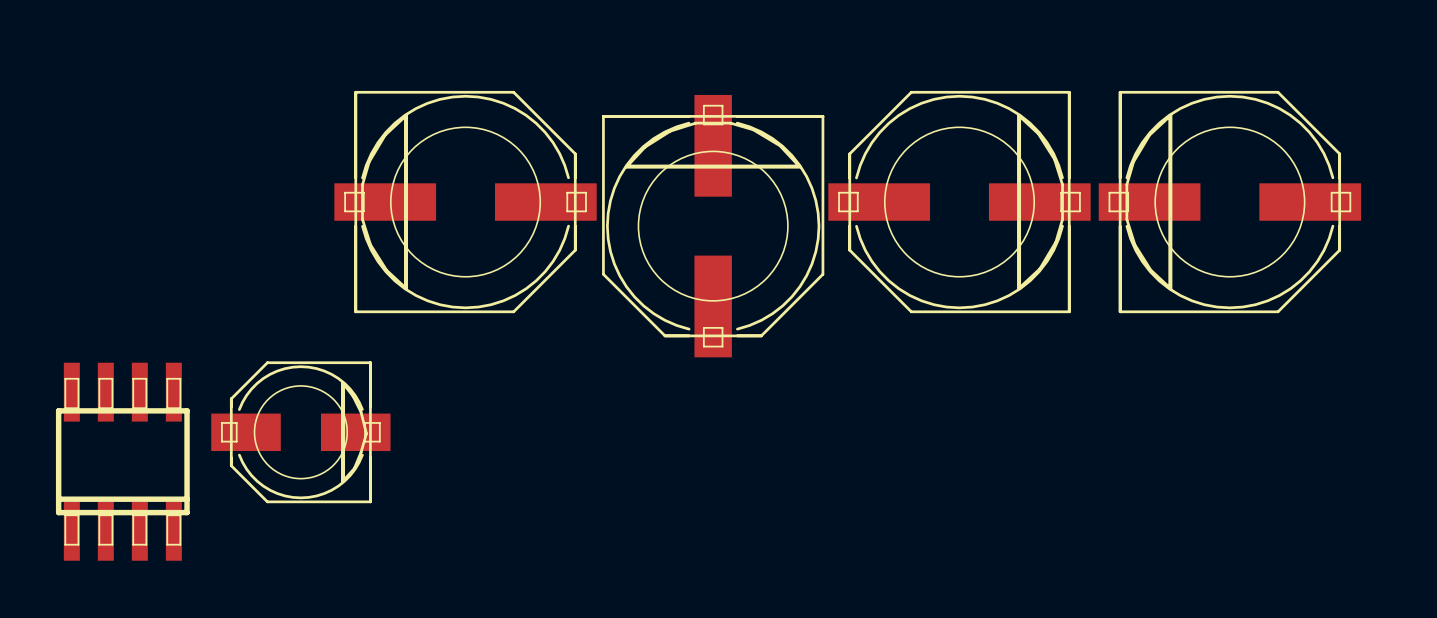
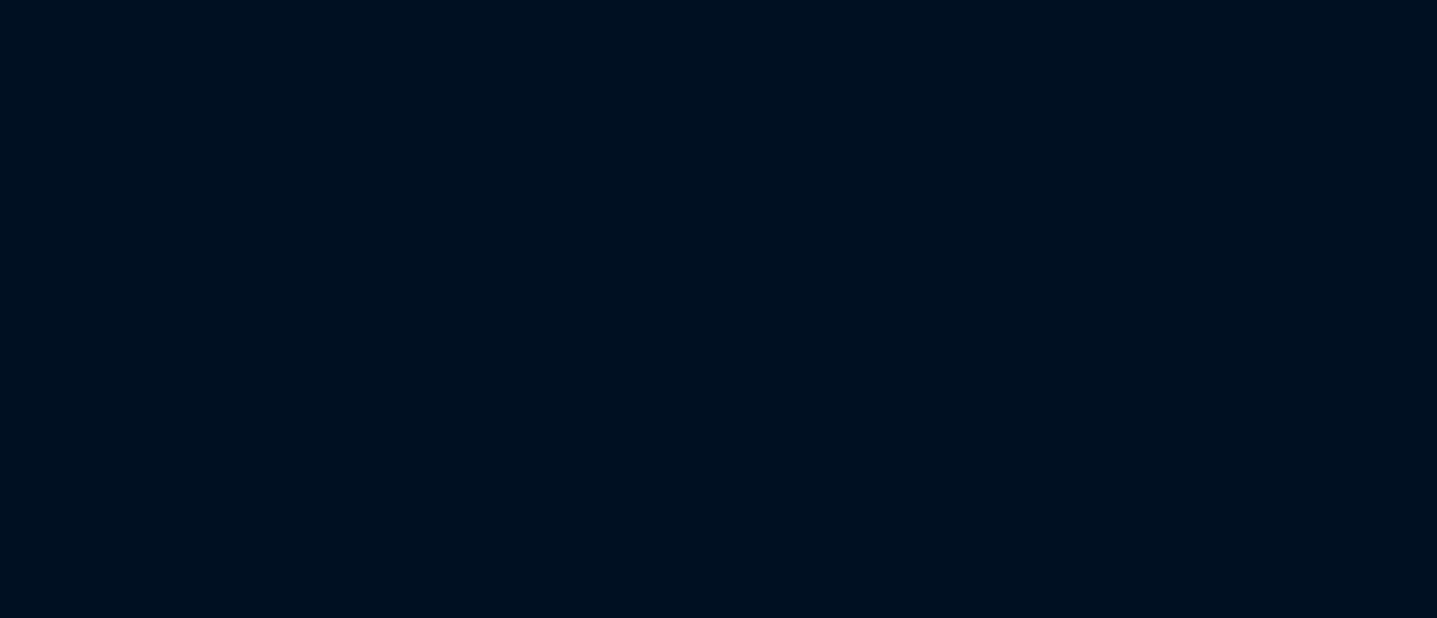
part: (465, 202) -> none
part: (959, 202) -> none
part: (1229, 202) -> none
part: (713, 226) -> none
part: (300, 432) -> none
part: (122, 461) -> none

